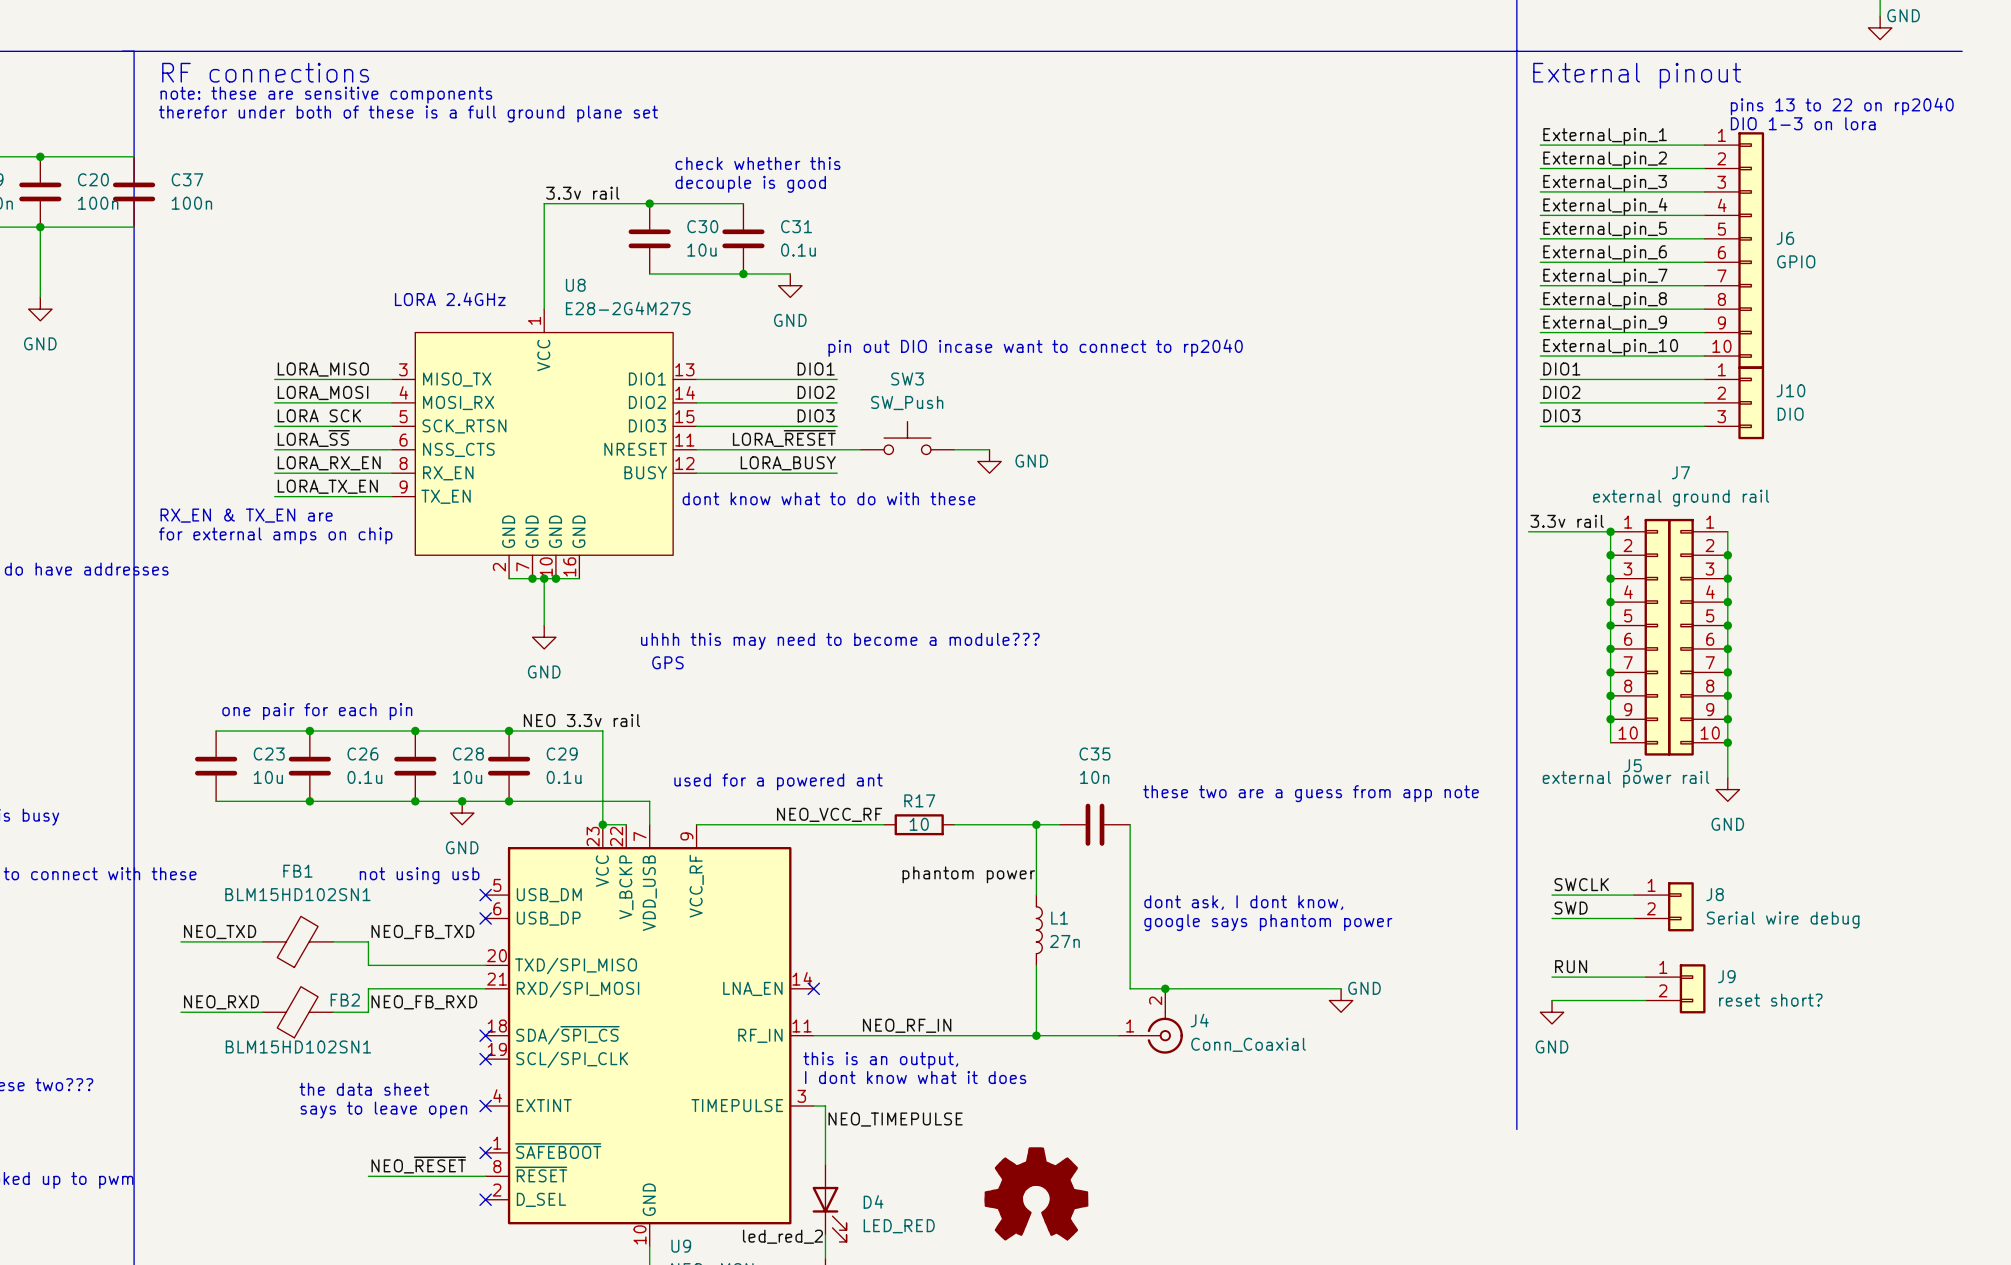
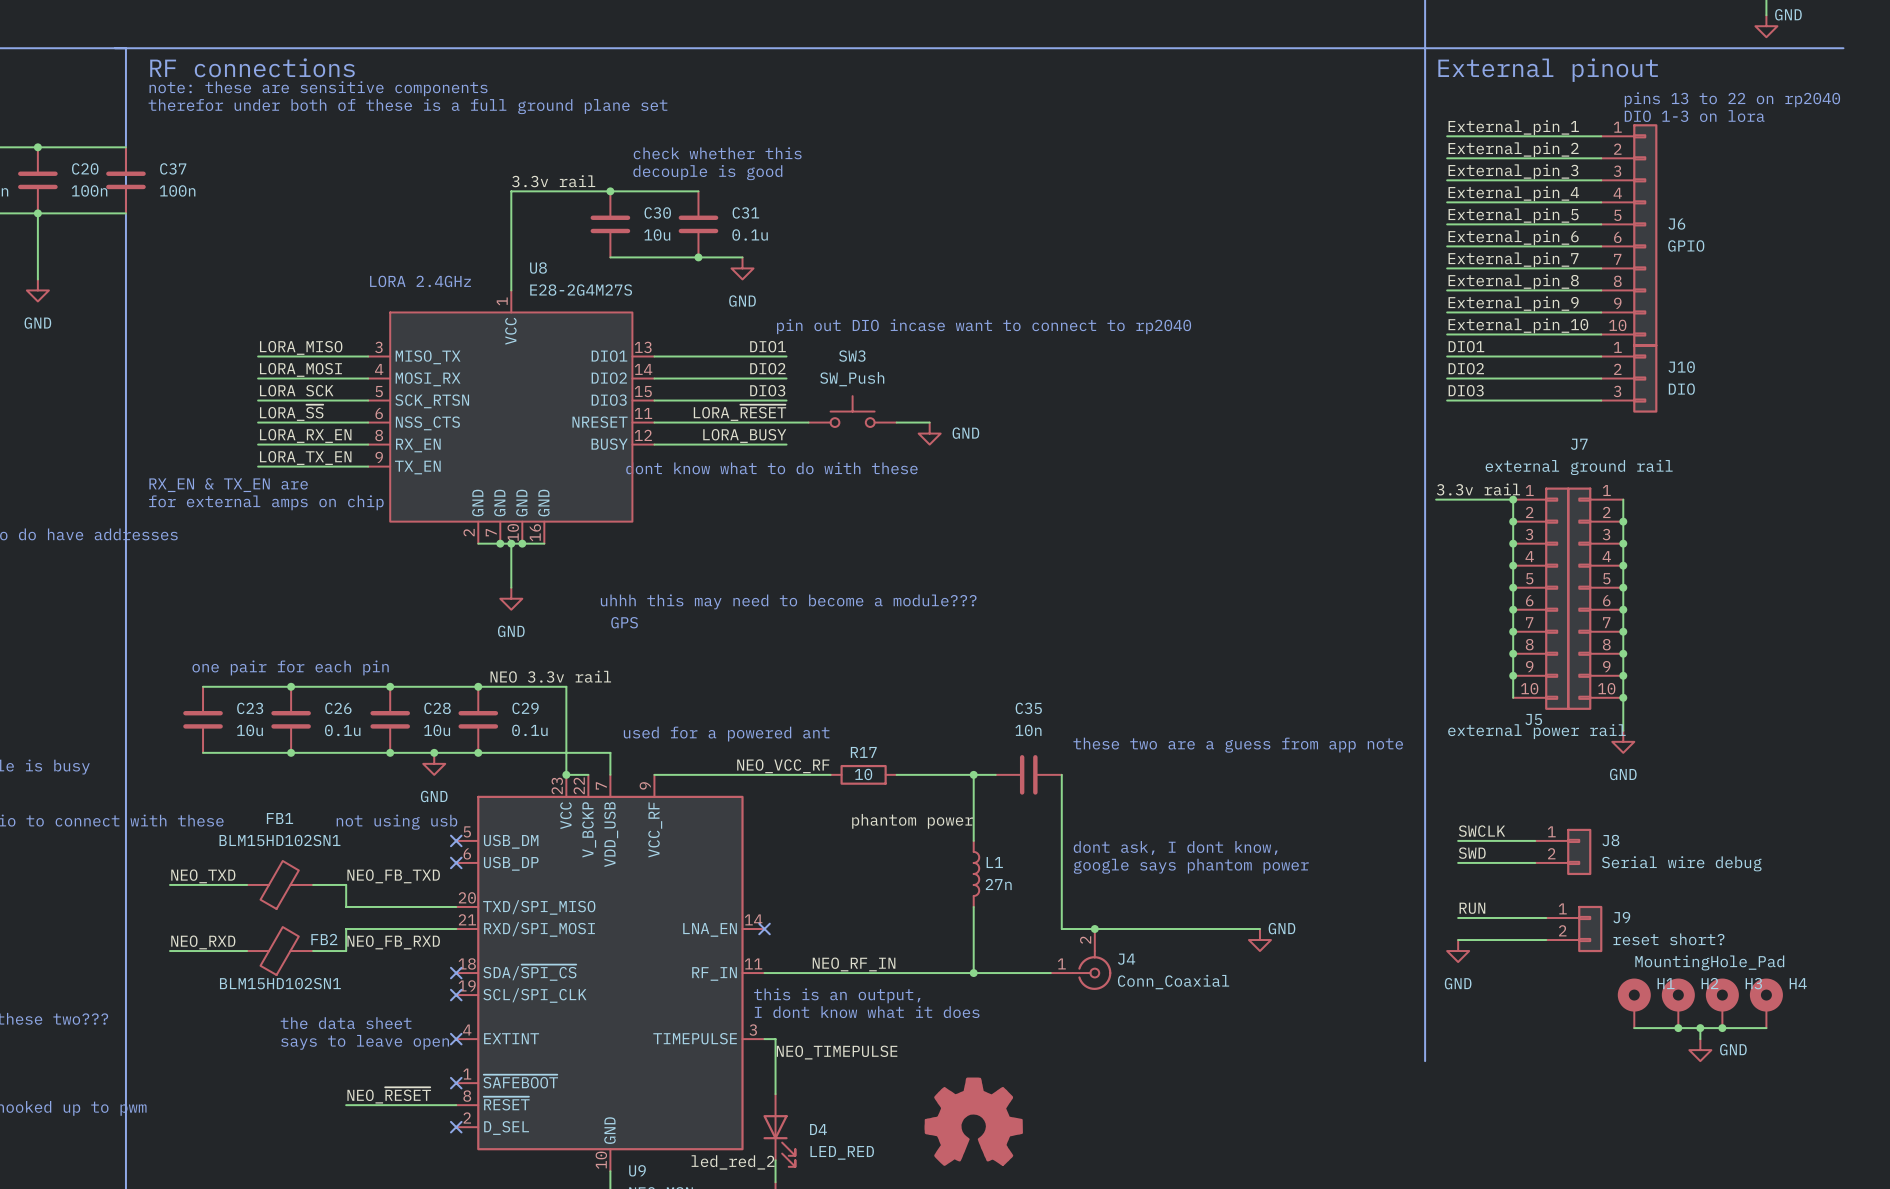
H1: none -> MountingHole_Pad (1634, 1003)
H2: none -> (1678, 1003)
H3: none -> (1722, 1003)
H4: none -> (1766, 1003)
wire: none -> (1634, 1028) (1766, 1028)
junction: none -> (1678, 1028)
wire: none -> (1700, 1028) (1700, 1039)
junction: none -> (1700, 1028)
junction: none -> (1722, 1028)
power symbol: none -> GND (1700, 1050)

